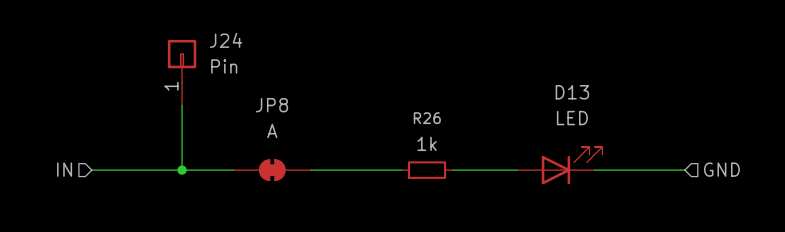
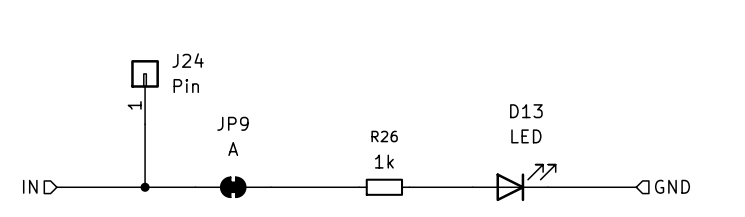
JP8 name: JP8 (272, 105) -> JP9 (232, 123)

